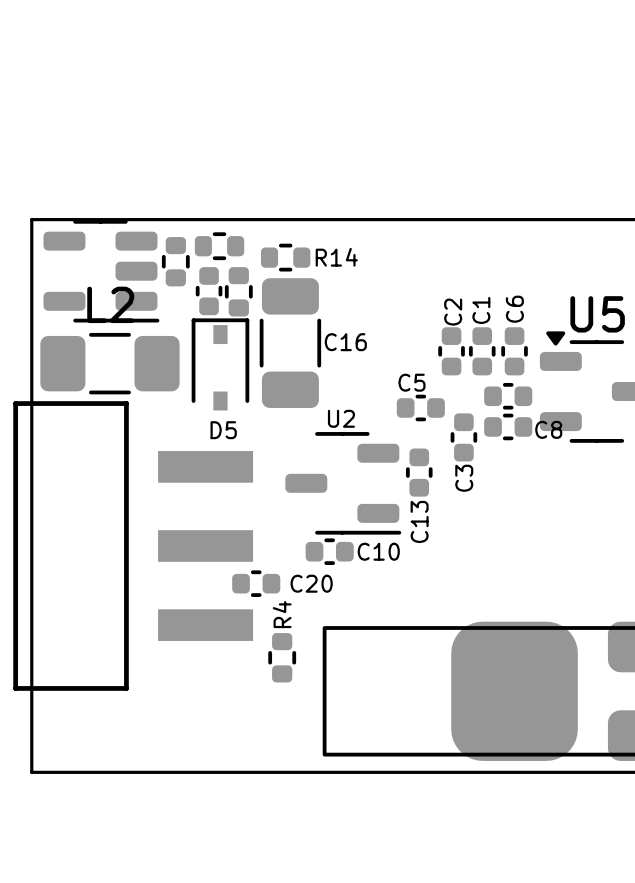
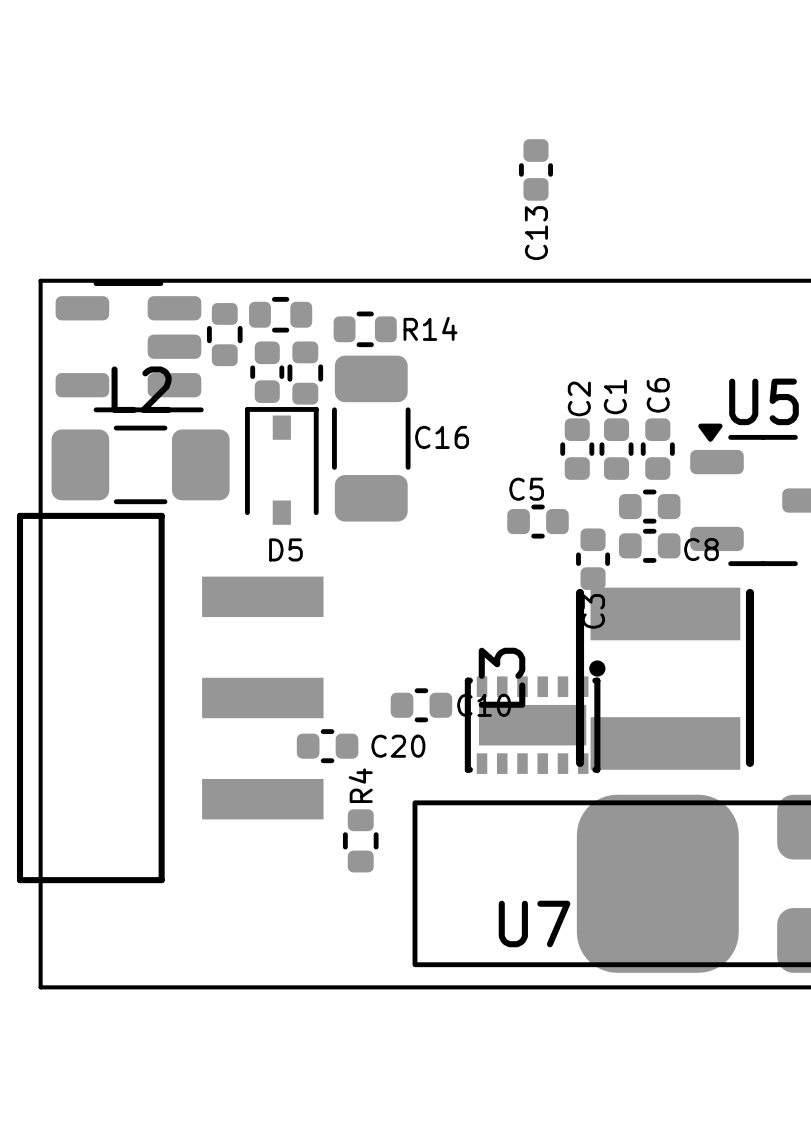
C13 position: (419, 472) -> (535, 169)
U2: (343, 483) -> none
L3: none -> (665, 678)
U7: none -> (535, 717)

